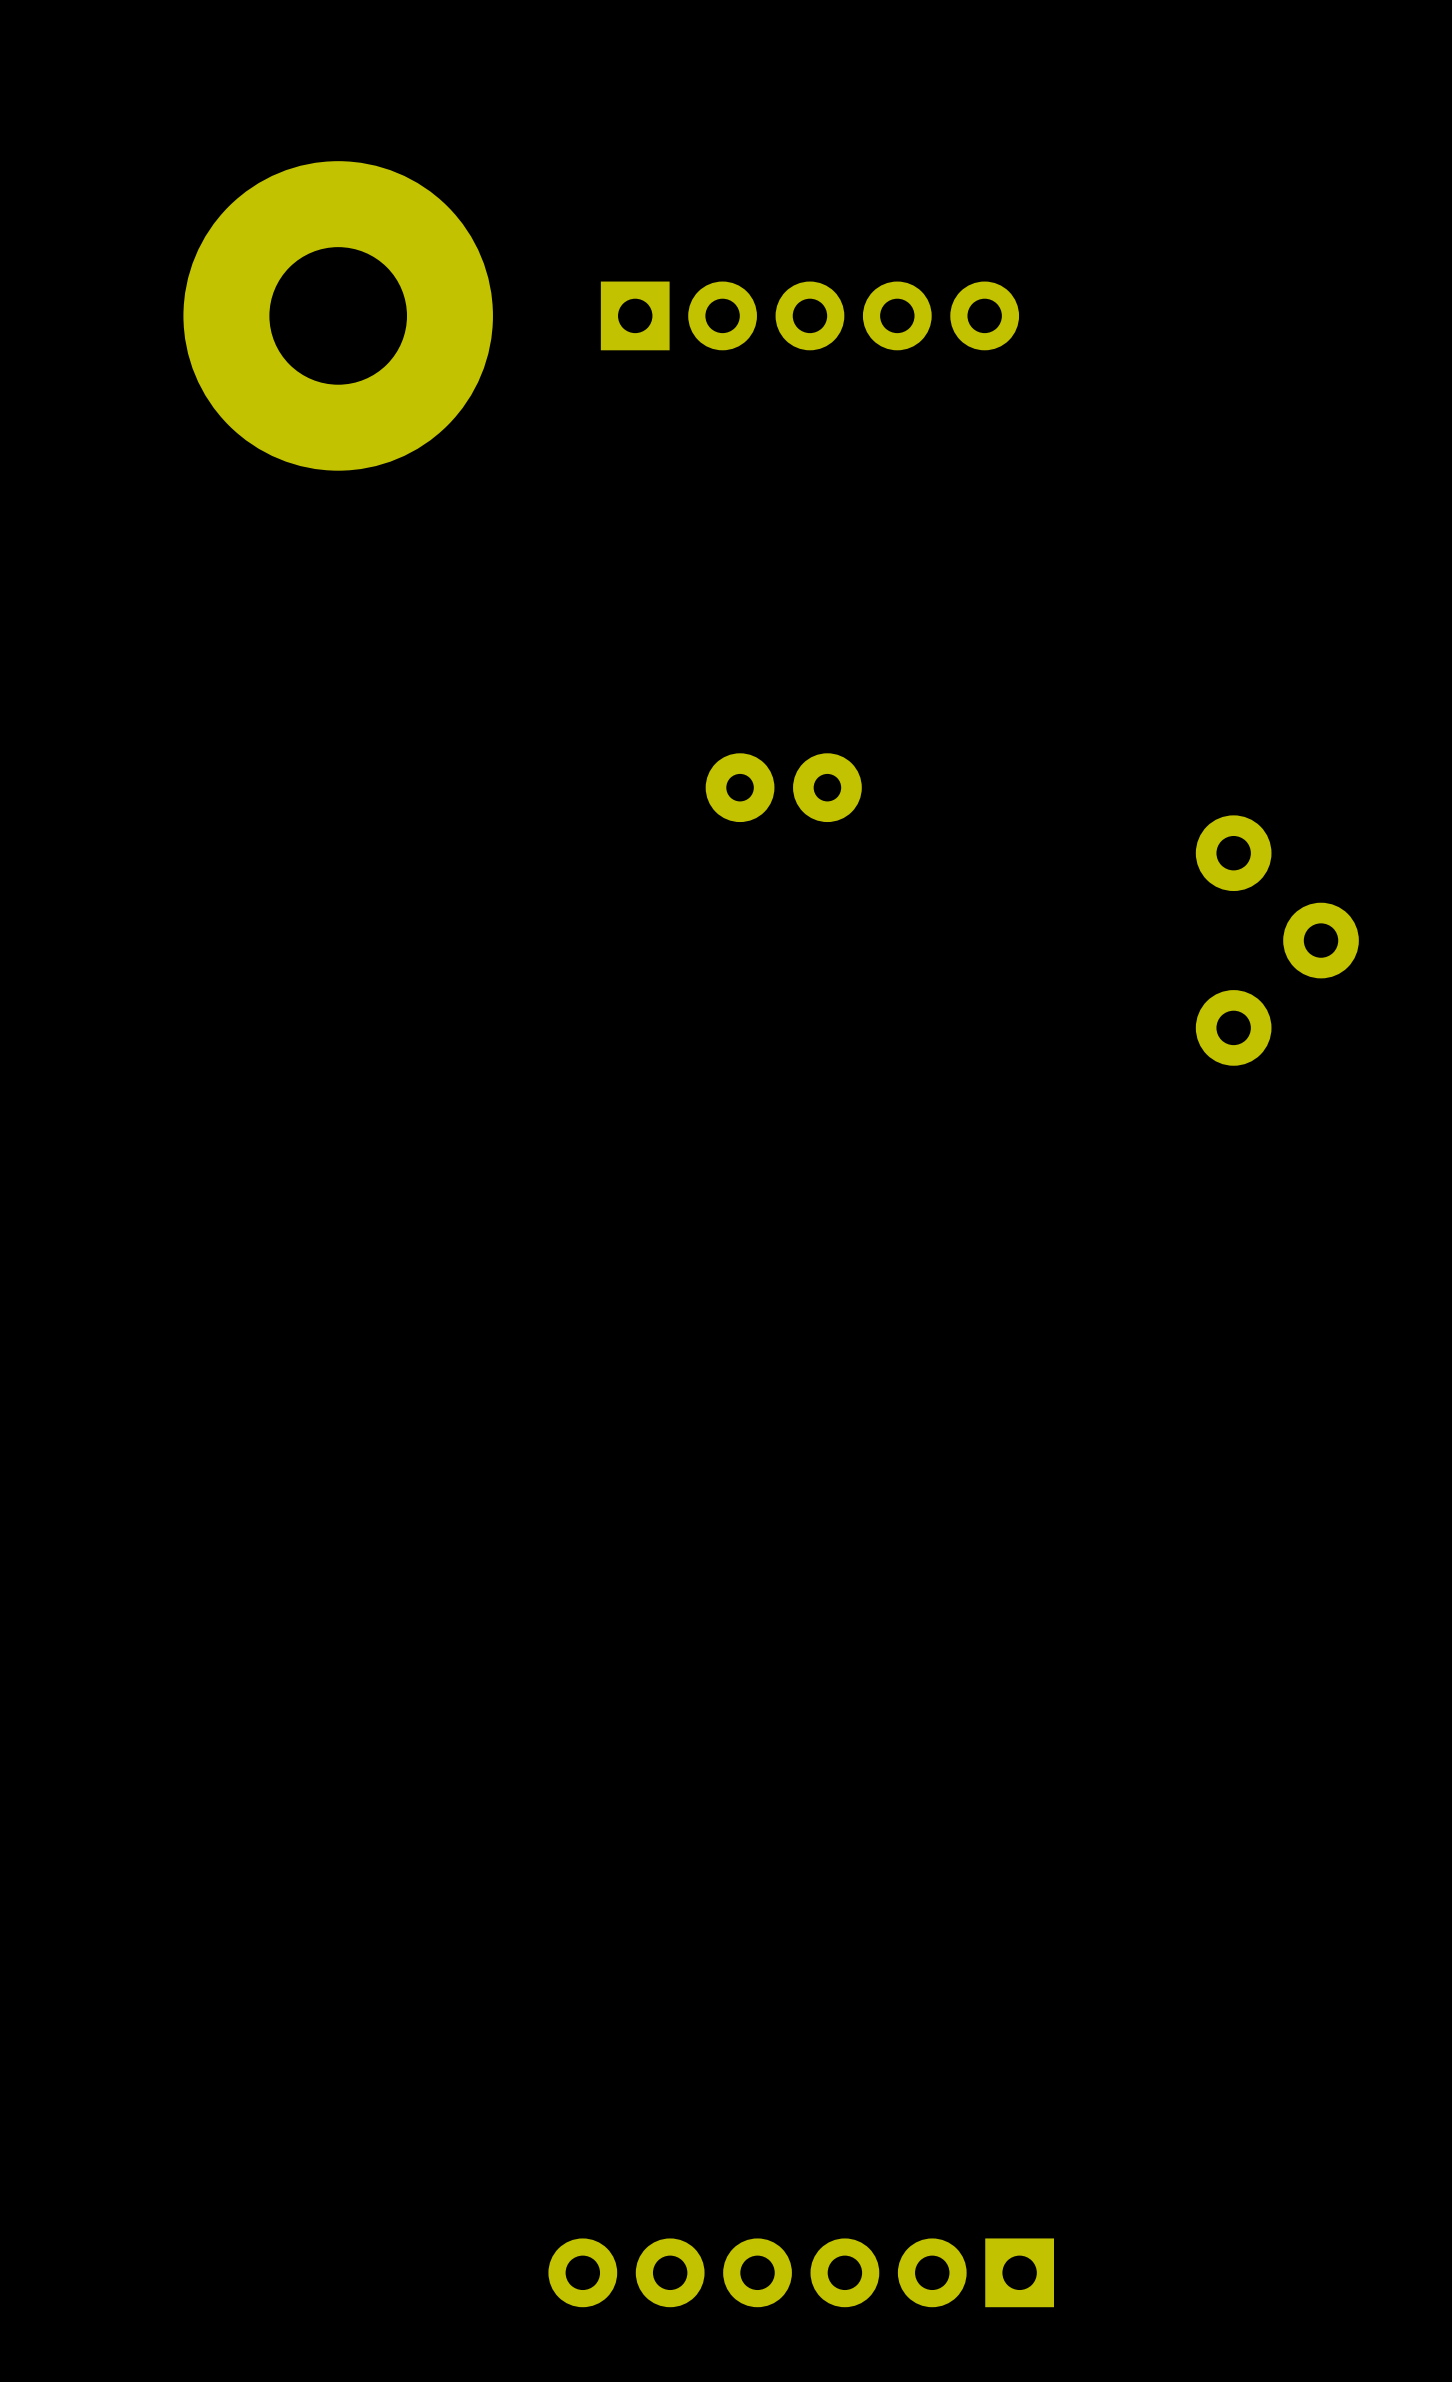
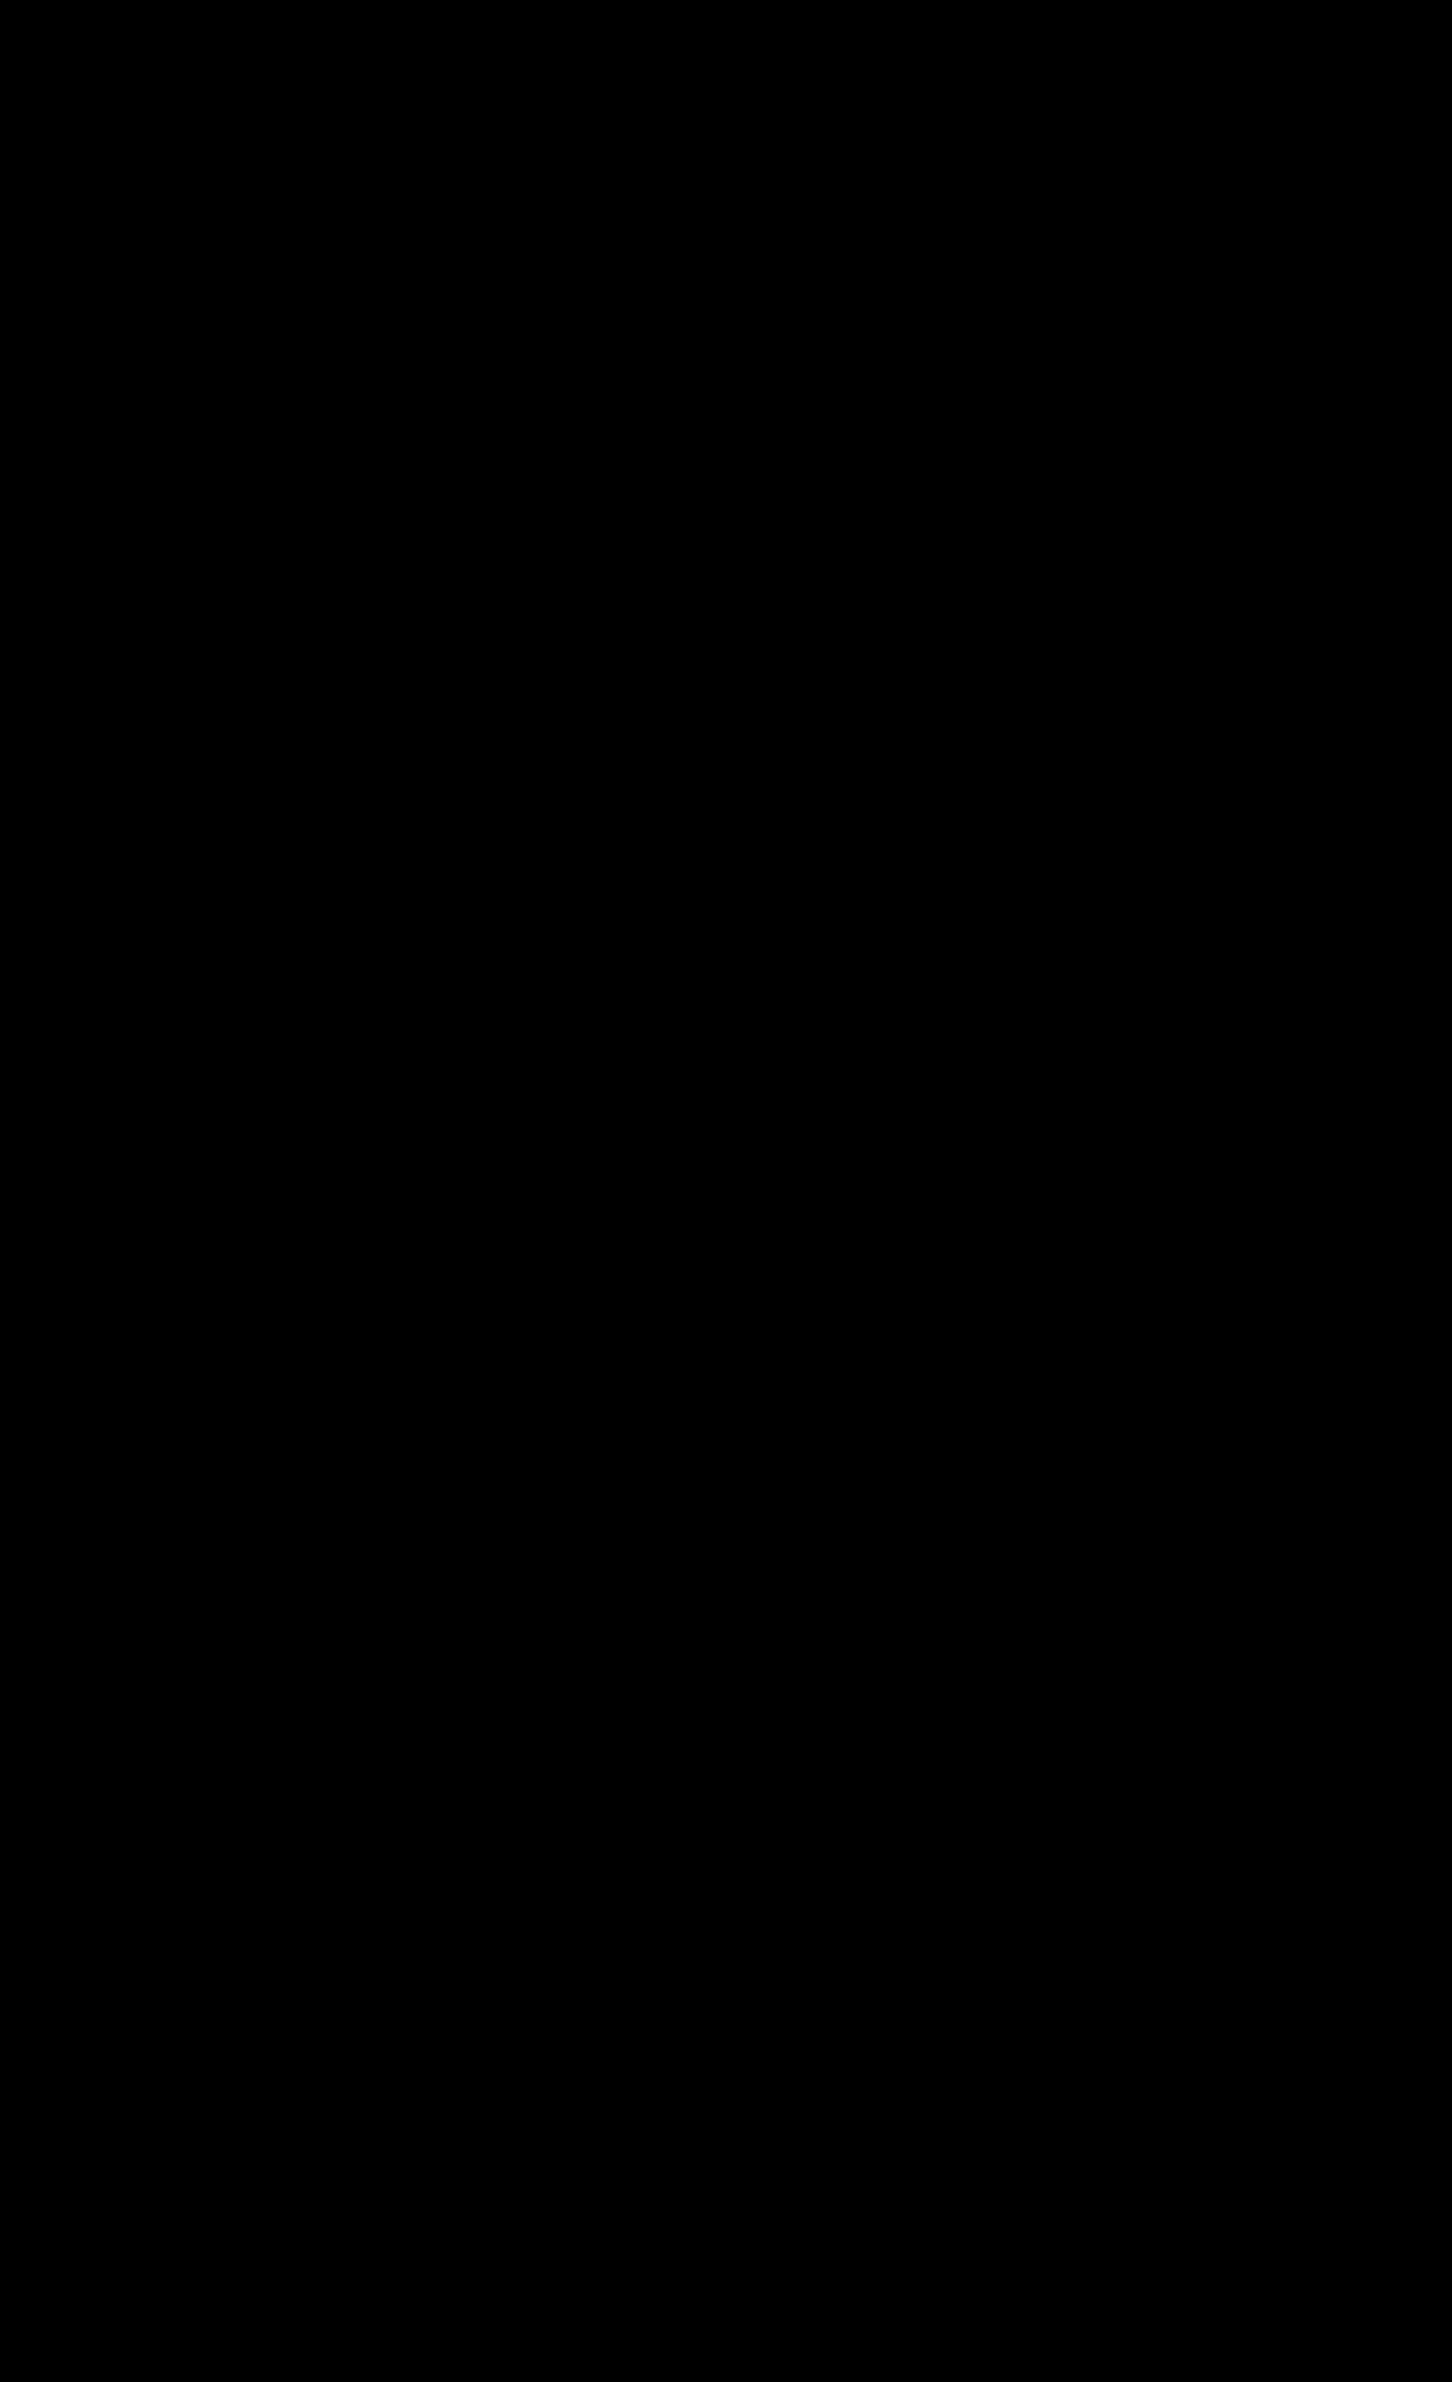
part: (338, 315) -> none
part: (809, 315) -> none
part: (783, 787) -> none
part: (1277, 940) -> none
part: (801, 2272) -> none

